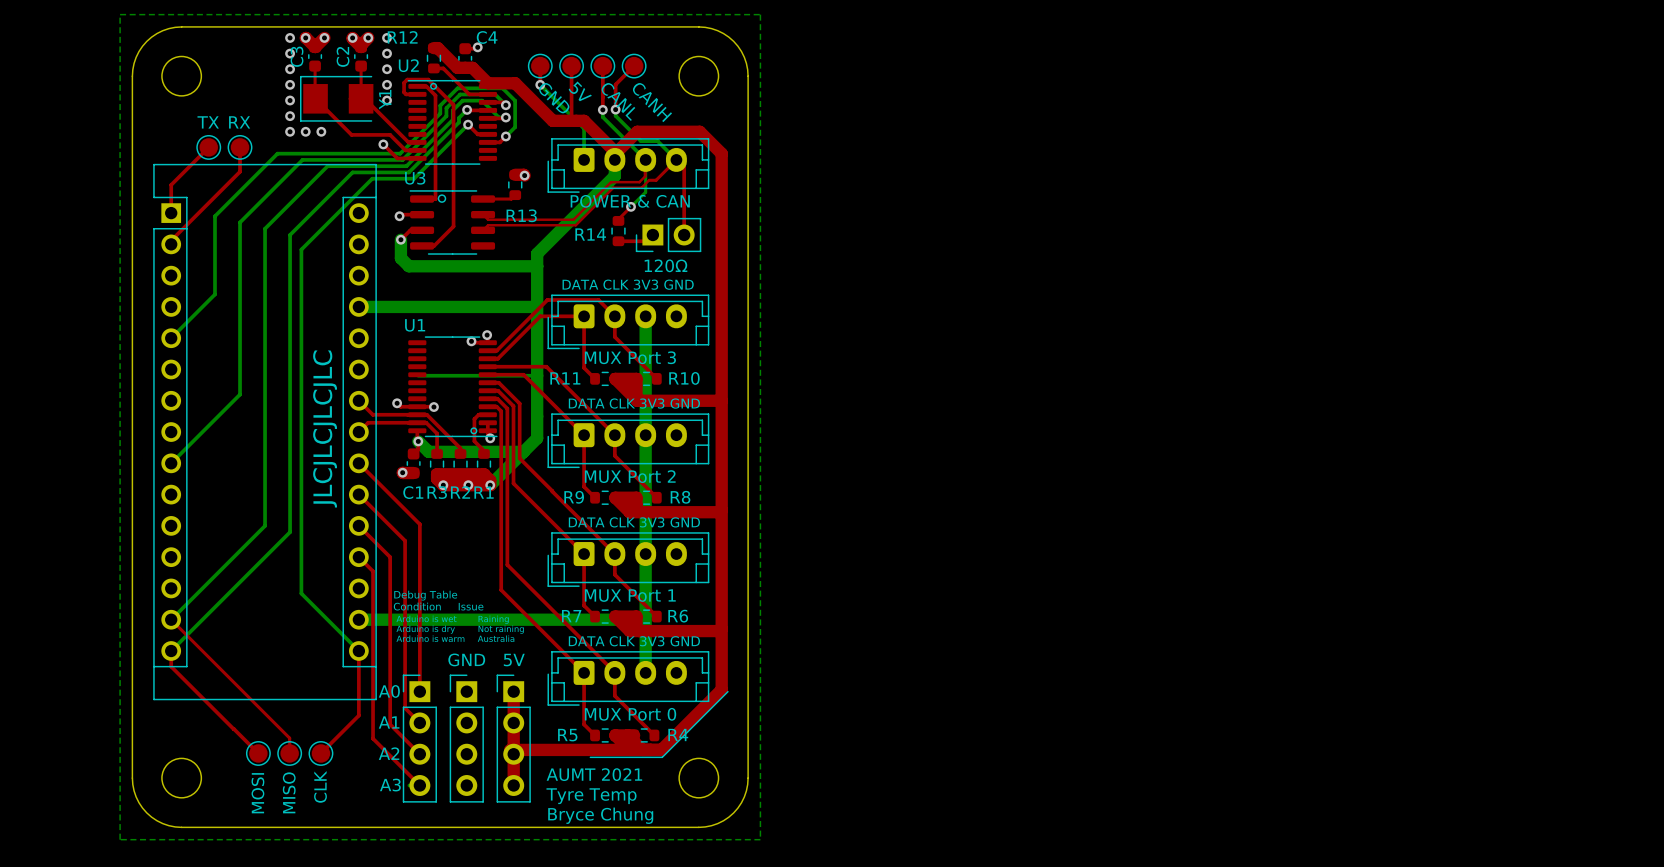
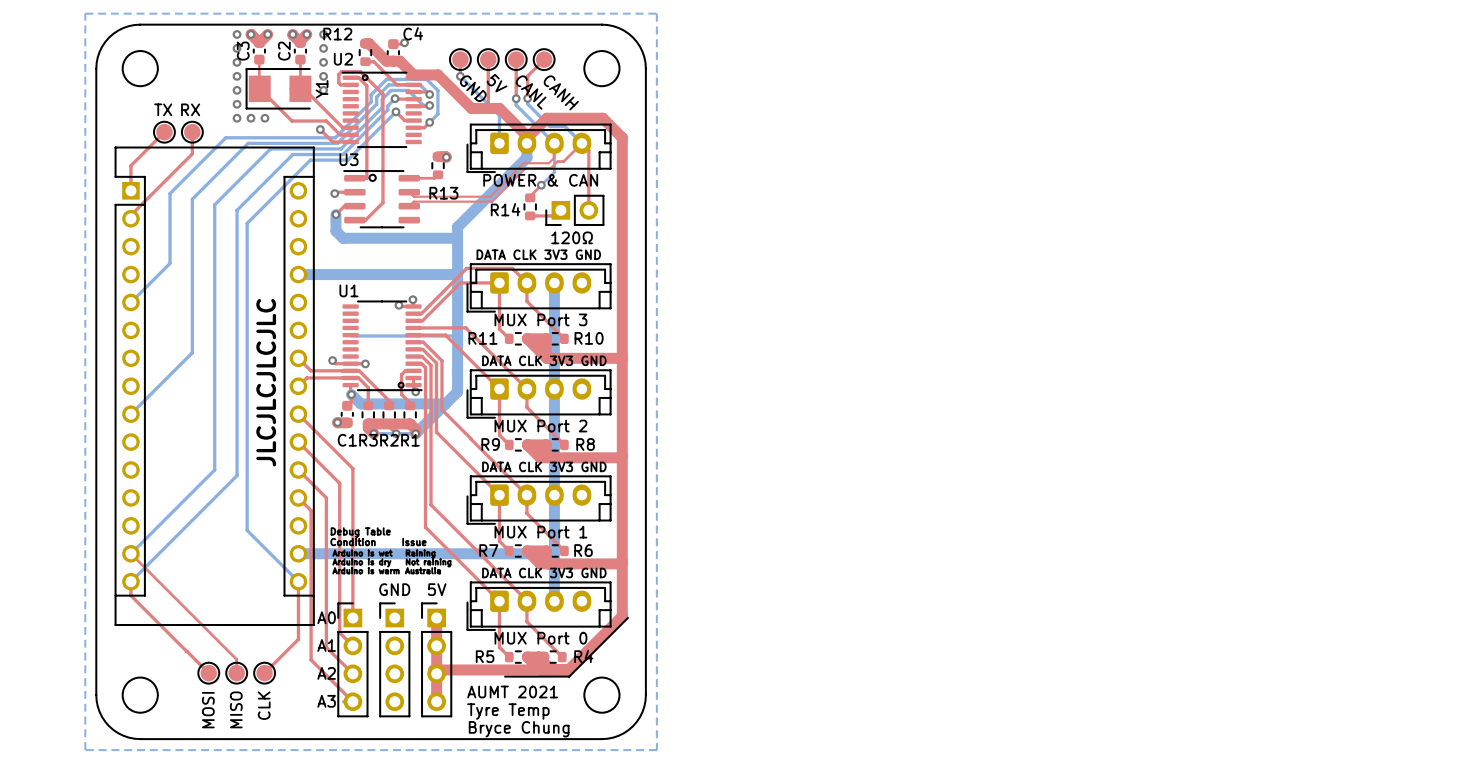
top track: (443, 485) (490, 485) -> none

